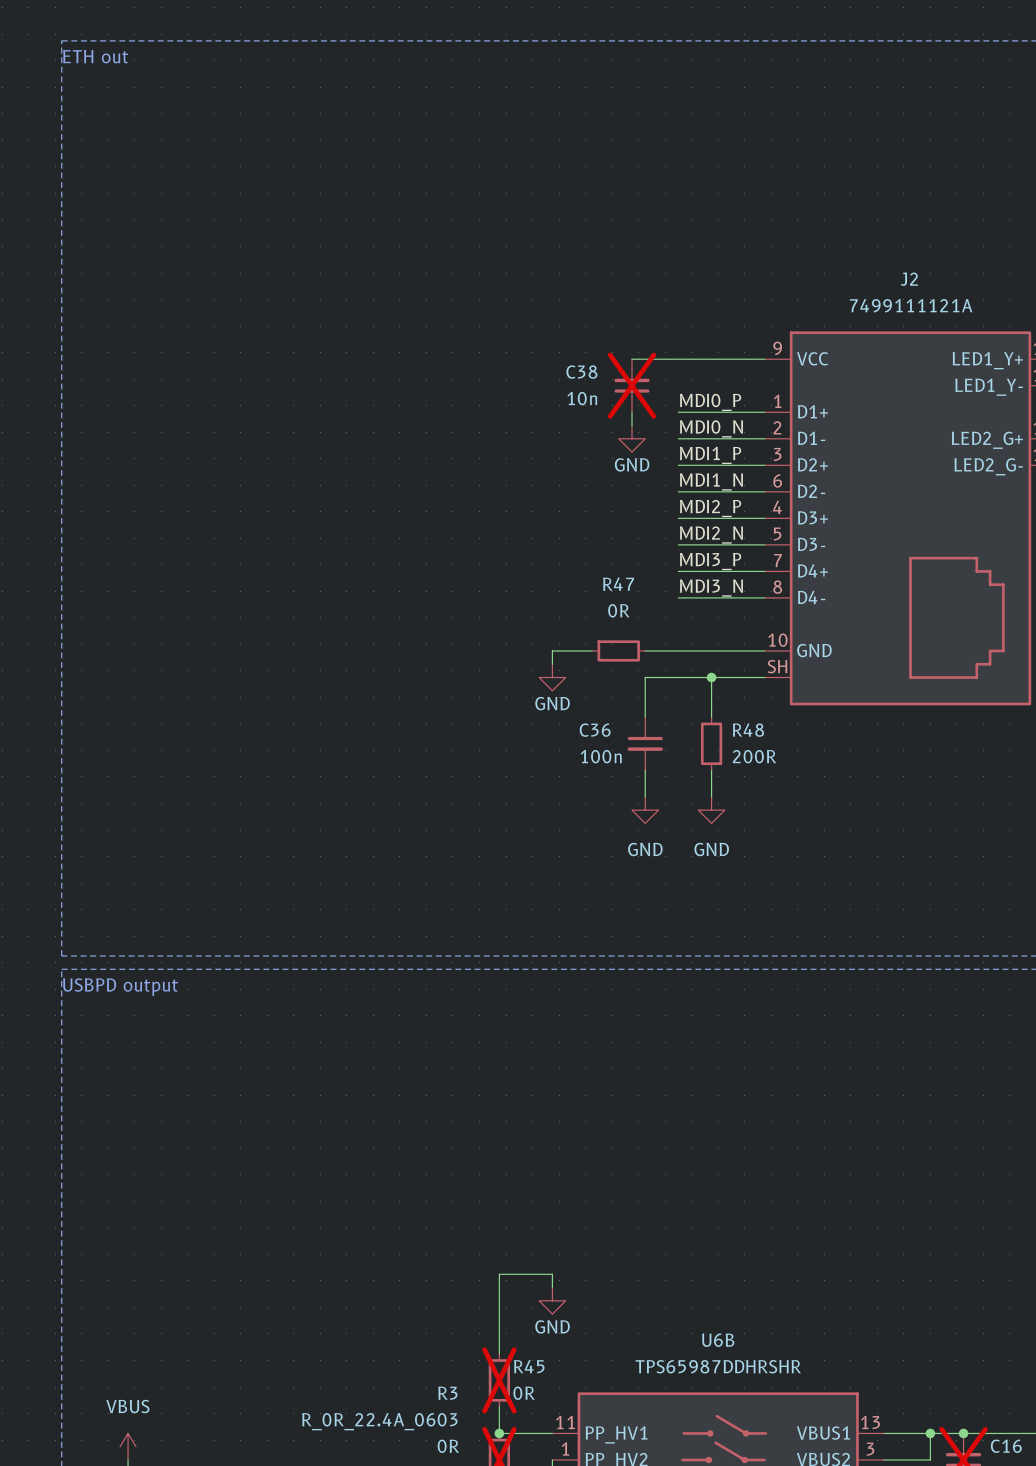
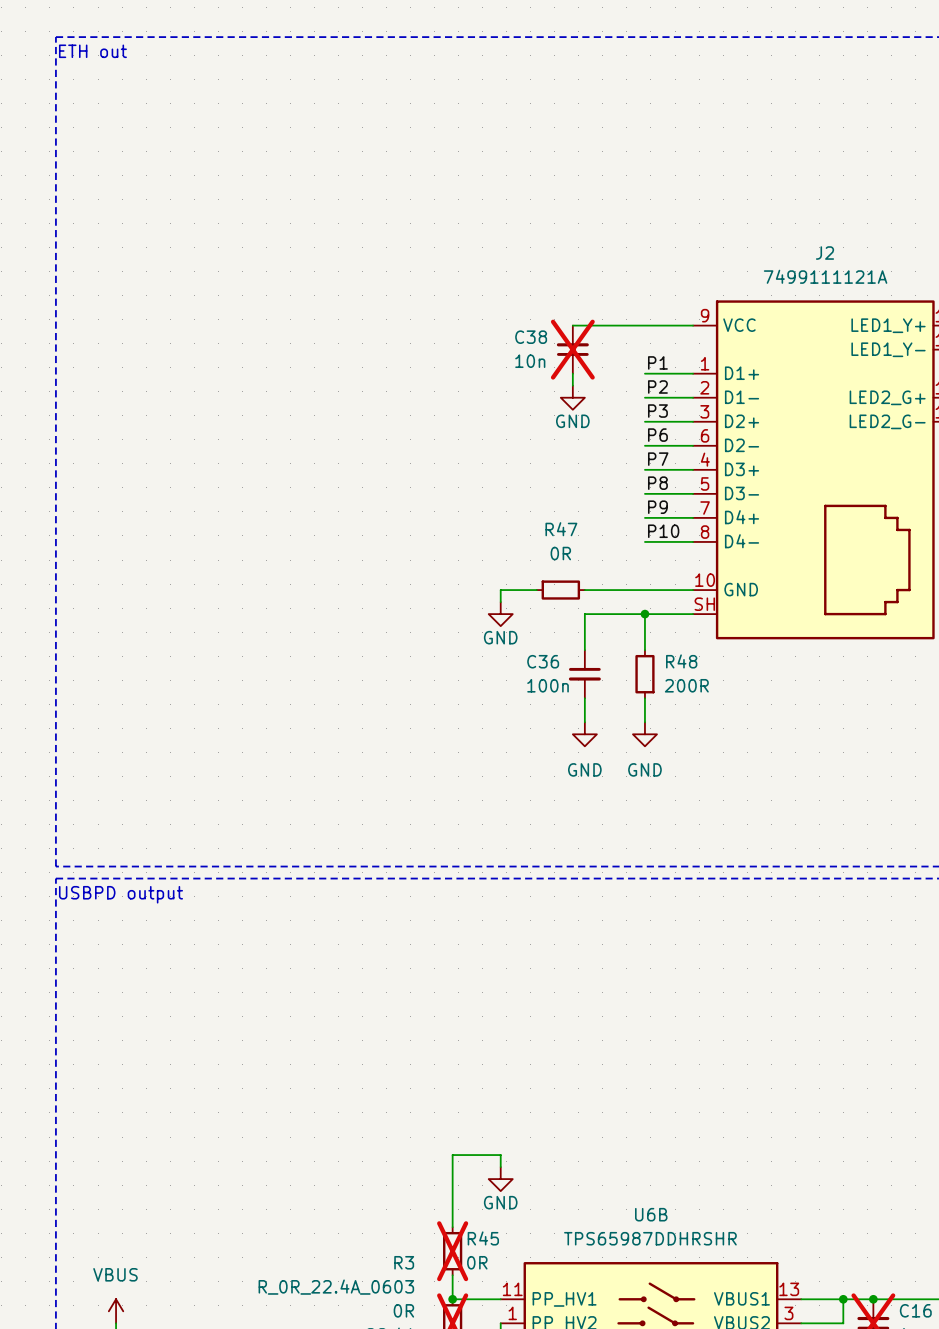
label: none -> P1 (657, 362)
label: MDI0_P (710, 402) -> none
wire: (678, 412) (711, 412) -> none
label: none -> P2 (657, 386)
label: MDI0_N (711, 428) -> none
wire: (678, 438) (711, 438) -> none
label: none -> P3 (657, 411)
label: MDI1_P (710, 455) -> none
wire: (678, 465) (711, 465) -> none
label: none -> P6 (657, 435)
label: MDI1_N (711, 481) -> none
wire: (678, 491) (711, 491) -> none
label: none -> P7 (658, 459)
label: MDI2_P (710, 508) -> none
wire: (678, 518) (711, 518) -> none
label: none -> P8 (657, 483)
label: MDI2_N (711, 535) -> none
wire: (678, 544) (711, 544) -> none
label: none -> P9 (657, 507)
label: MDI3_P (710, 561) -> none
wire: (678, 571) (711, 571) -> none
label: none -> P10 (663, 531)
label: MDI3_N (711, 588) -> none
wire: (678, 597) (711, 597) -> none

